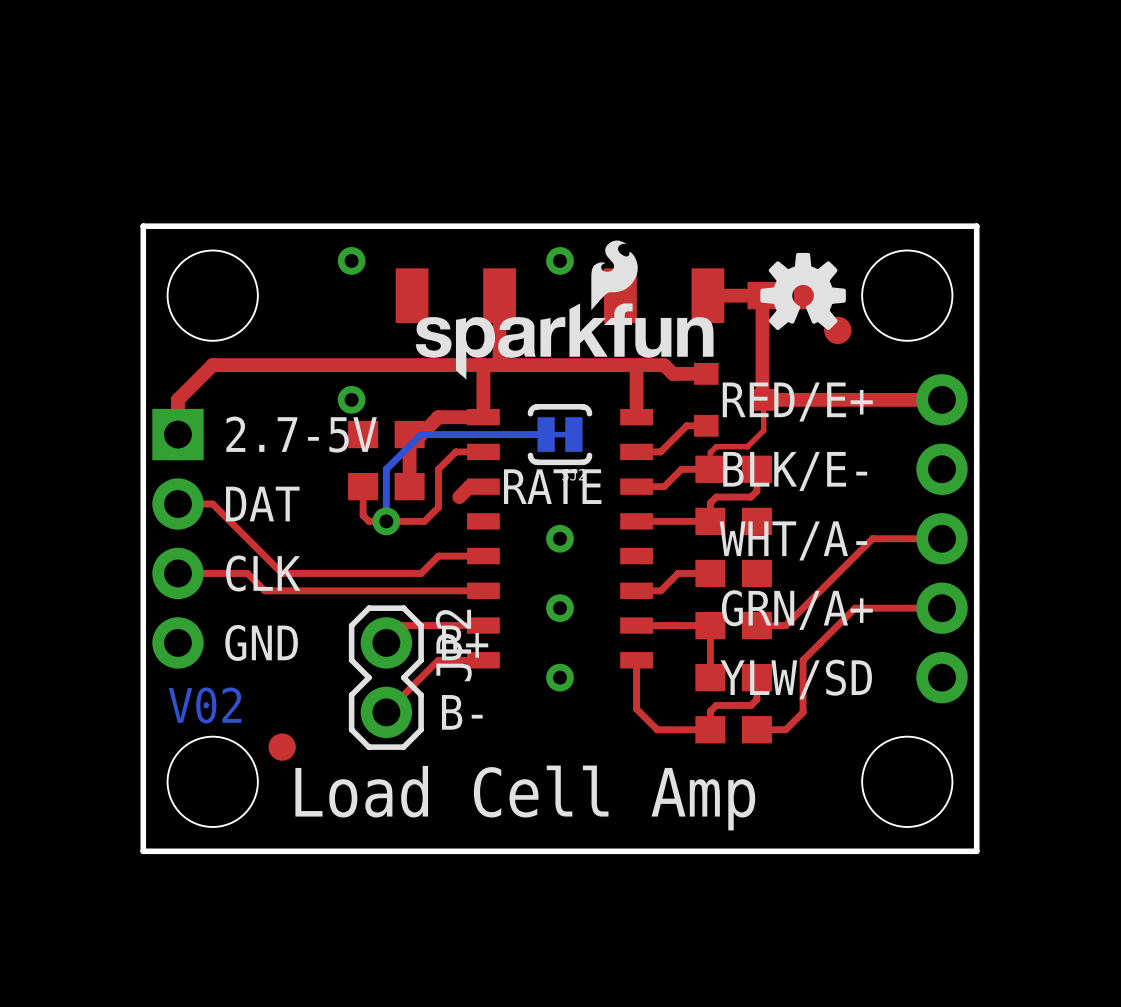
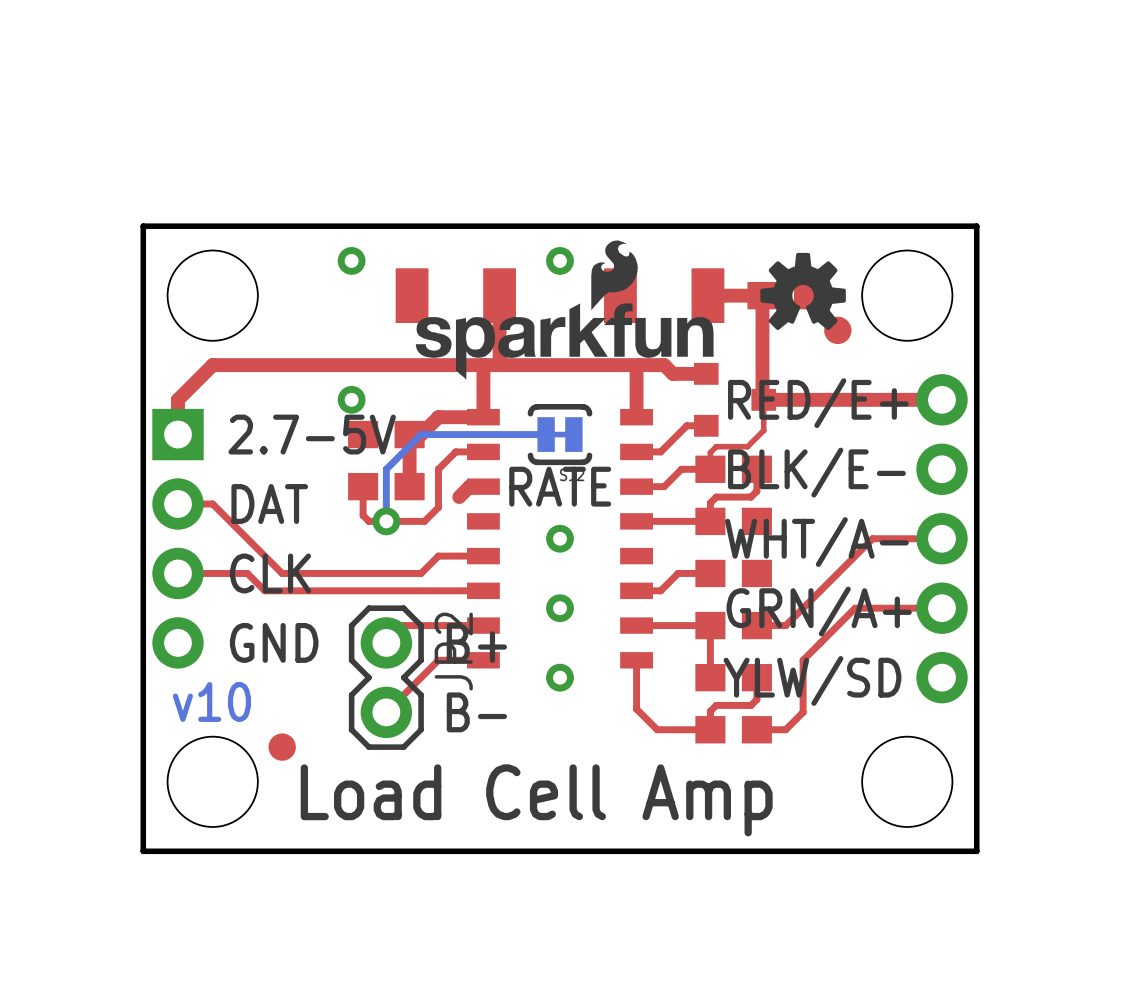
drawing: none -> [172, 681, 252, 722]
text: V02 (205, 705) -> none

